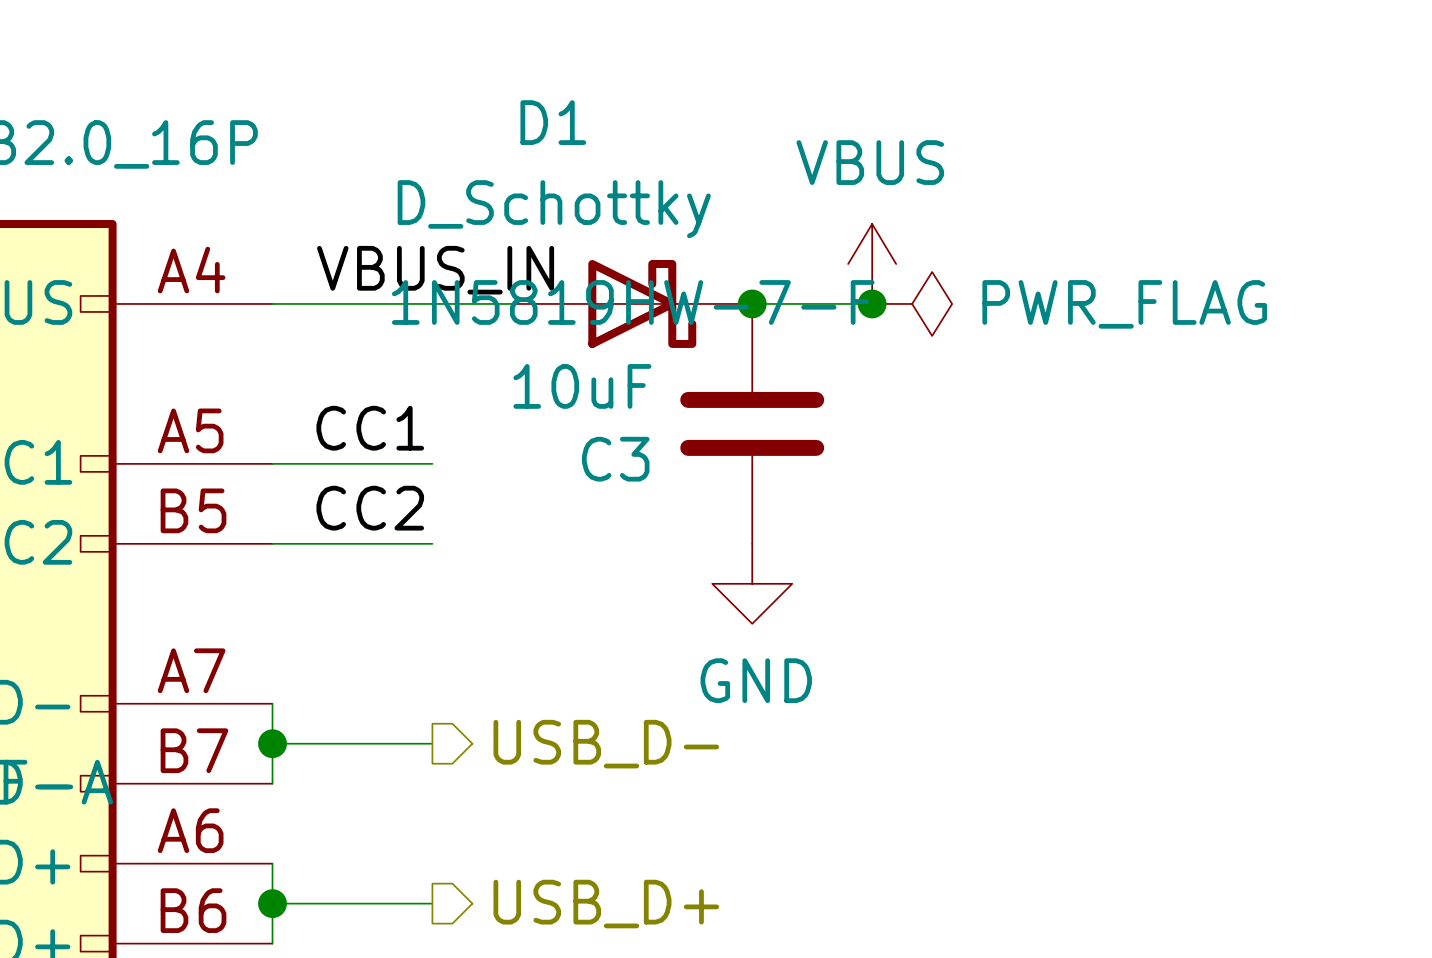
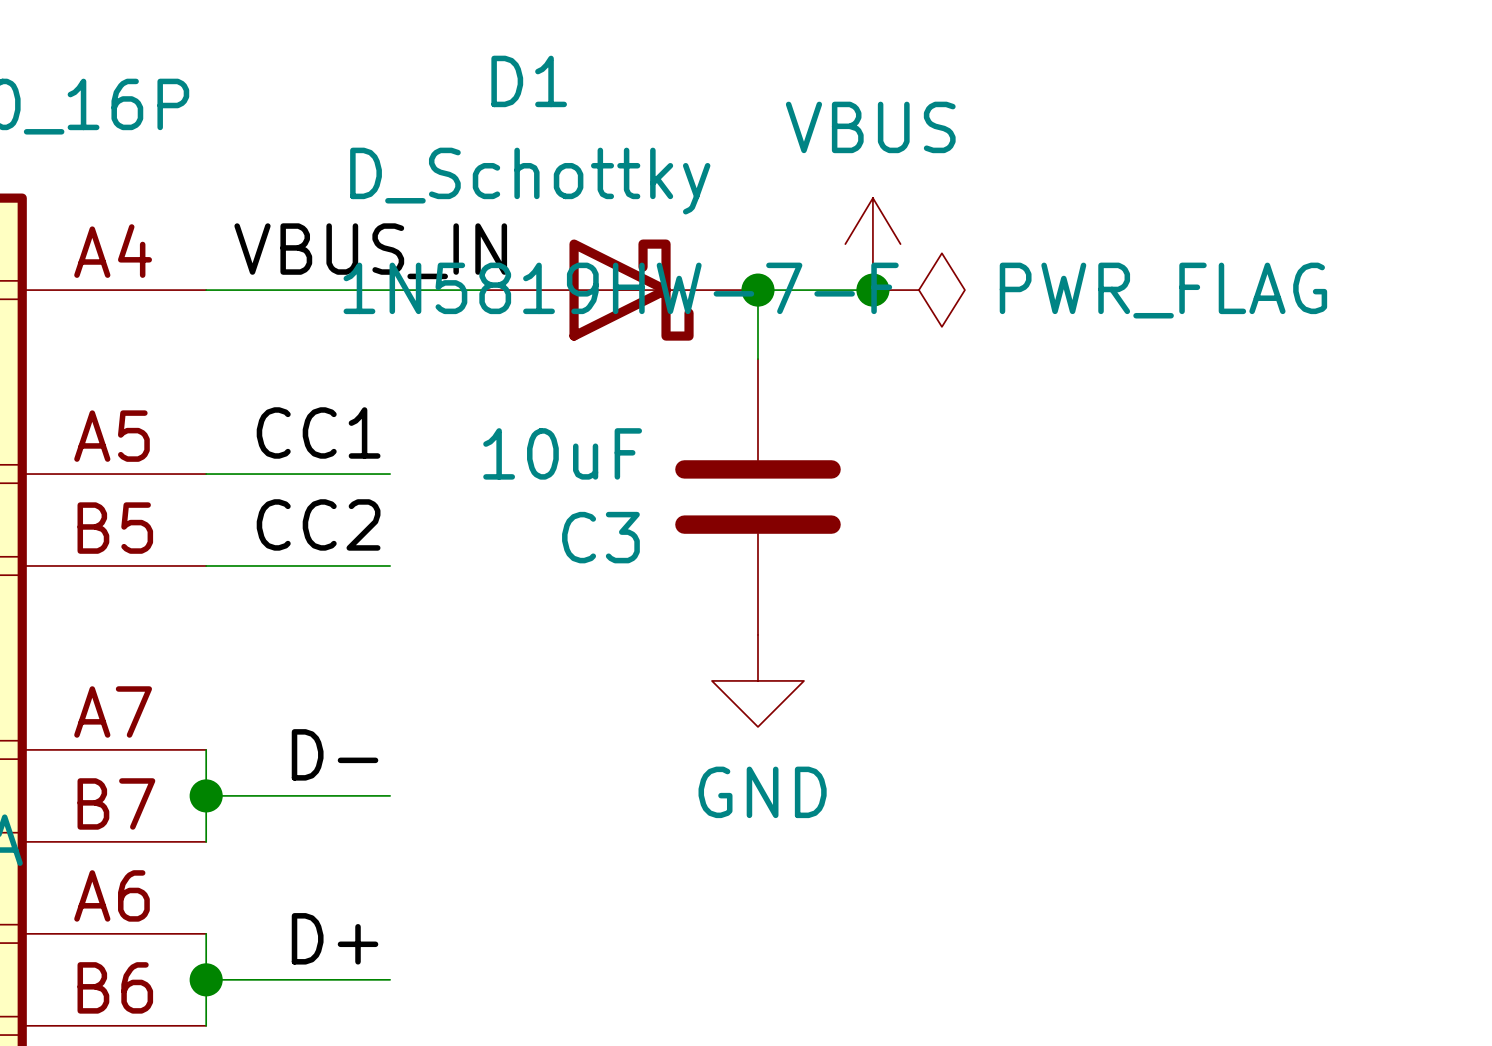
power symbol position: VBUS (872, 263) -> VBUS (872, 244)
label position: VBUS_IN (435, 270) -> VBUS_IN (370, 251)
junction position: (872, 303) -> (872, 290)
power symbol position: PWR_FLAG (912, 303) -> PWR_FLAG (918, 290)
C3 position: (752, 423) -> (757, 497)
power symbol position: GND (752, 583) -> GND (757, 680)
label: none -> D- (335, 754)
hierarchical label: USB_D- (606, 744) -> none
label: none -> D+ (335, 938)
hierarchical label: USB_D+ (606, 904) -> none

